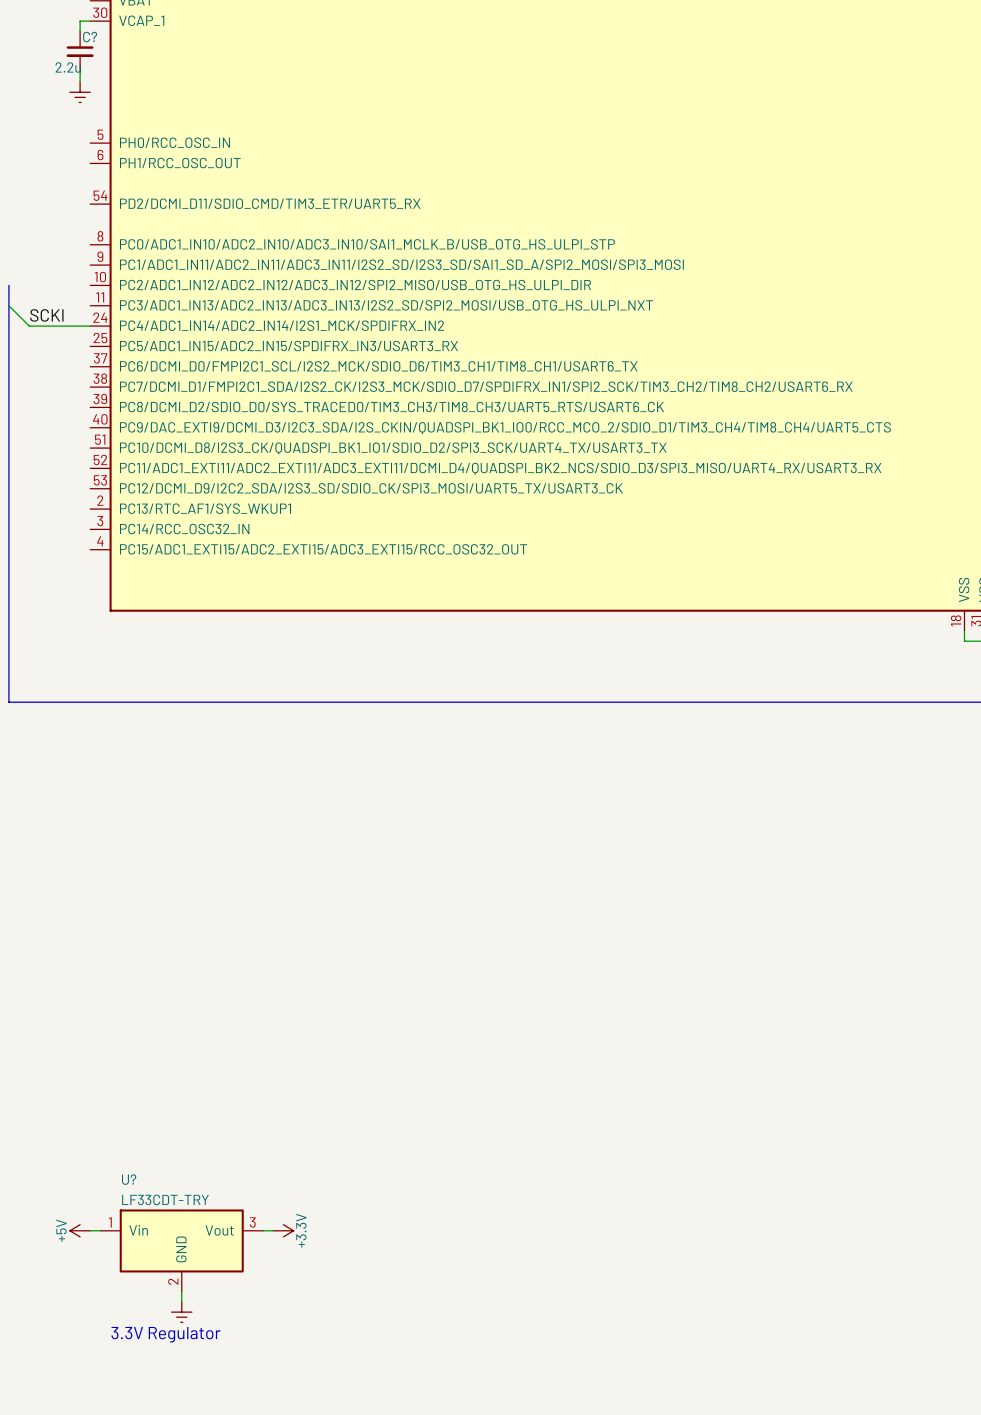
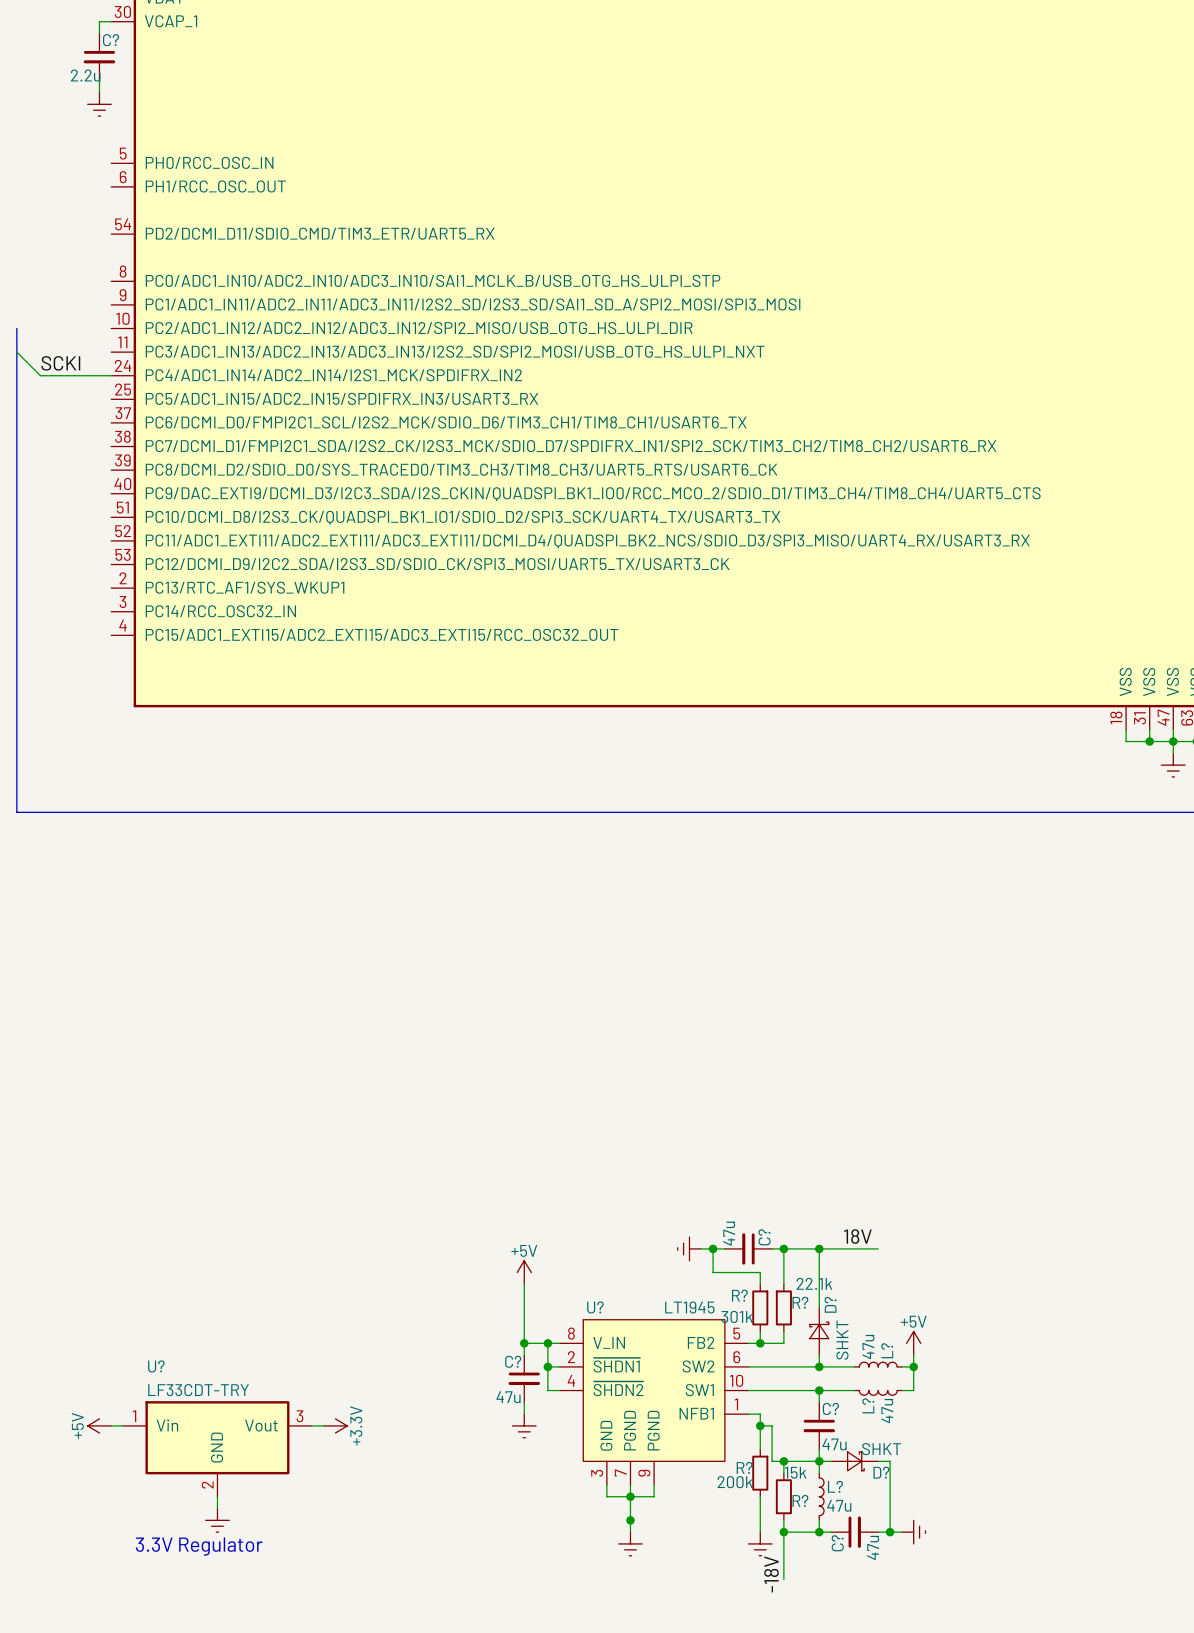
label: none -> 18V (857, 1236)
power symbol: none -> (689, 1248)
wire: none -> (701, 1248) (724, 1248)
wire: none -> (713, 1248) (713, 1272) (760, 1272) (760, 1284)
junction: none -> (713, 1248)
C?: none -> 47u (748, 1248)
wire: none -> (772, 1248) (878, 1248)
wire: none -> (783, 1248) (783, 1284)
junction: none -> (783, 1248)
wire: none -> (819, 1248) (819, 1307)
junction: none -> (819, 1248)
power symbol: none -> +5V (524, 1272)
wire: none -> (524, 1284) (524, 1355)
R?: none -> 301k (760, 1307)
R?: none -> 22.1k (783, 1307)
wire: none -> (760, 1331) (760, 1343)
wire: none -> (783, 1331) (783, 1343) (748, 1343)
D?: none -> SHKT (819, 1331)
wire: none -> (524, 1343) (559, 1343)
junction: none -> (524, 1343)
wire: none -> (547, 1343) (547, 1390) (559, 1390)
junction: none -> (547, 1343)
junction: none -> (760, 1343)
power symbol: none -> +5V (913, 1343)
wire: none -> (819, 1355) (819, 1366)
wire: none -> (913, 1355) (913, 1390) (901, 1390)
L?: none -> 47u (878, 1364)
wire: none -> (547, 1366) (559, 1366)
junction: none -> (547, 1366)
wire: none -> (748, 1366) (854, 1366)
junction: none -> (819, 1366)
wire: none -> (901, 1366) (913, 1366)
junction: none -> (913, 1366)
C?: none -> 47u (524, 1378)
wire: none -> (748, 1390) (854, 1390)
wire: none -> (819, 1390) (819, 1402)
junction: none -> (819, 1390)
L?: none -> 47u (878, 1392)
wire: none -> (524, 1402) (524, 1414)
U?: none -> LT1945 (654, 1402)
wire: none -> (748, 1414) (760, 1414) (760, 1449)
power symbol: none -> (524, 1425)
wire: none -> (760, 1425) (772, 1425) (772, 1461) (831, 1461)
junction: none -> (760, 1425)
C?: none -> 47u (819, 1425)
wire: none -> (819, 1449) (819, 1473)
wire: none -> (783, 1461) (783, 1473)
junction: none -> (783, 1461)
junction: none -> (819, 1461)
D?: none -> SHKT (854, 1461)
wire: none -> (878, 1461) (890, 1461) (890, 1532)
R?: none -> 200k (760, 1473)
wire: none -> (606, 1484) (606, 1496) (654, 1496) (654, 1484)
wire: none -> (630, 1484) (630, 1532)
junction: none -> (630, 1496)
wire: none -> (760, 1496) (760, 1532)
R?: none -> 15k (783, 1496)
L?: none -> 47u (821, 1496)
junction: none -> (630, 1520)
wire: none -> (783, 1520) (783, 1579)
wire: none -> (819, 1520) (819, 1532)
wire: none -> (783, 1532) (831, 1532)
junction: none -> (783, 1532)
junction: none -> (819, 1532)
C?: none -> 47u (854, 1532)
wire: none -> (878, 1532) (901, 1532)
junction: none -> (890, 1532)
power symbol: none -> (913, 1532)
power symbol: none -> (630, 1543)
power symbol: none -> (760, 1543)
label: none -> -18V (771, 1574)

